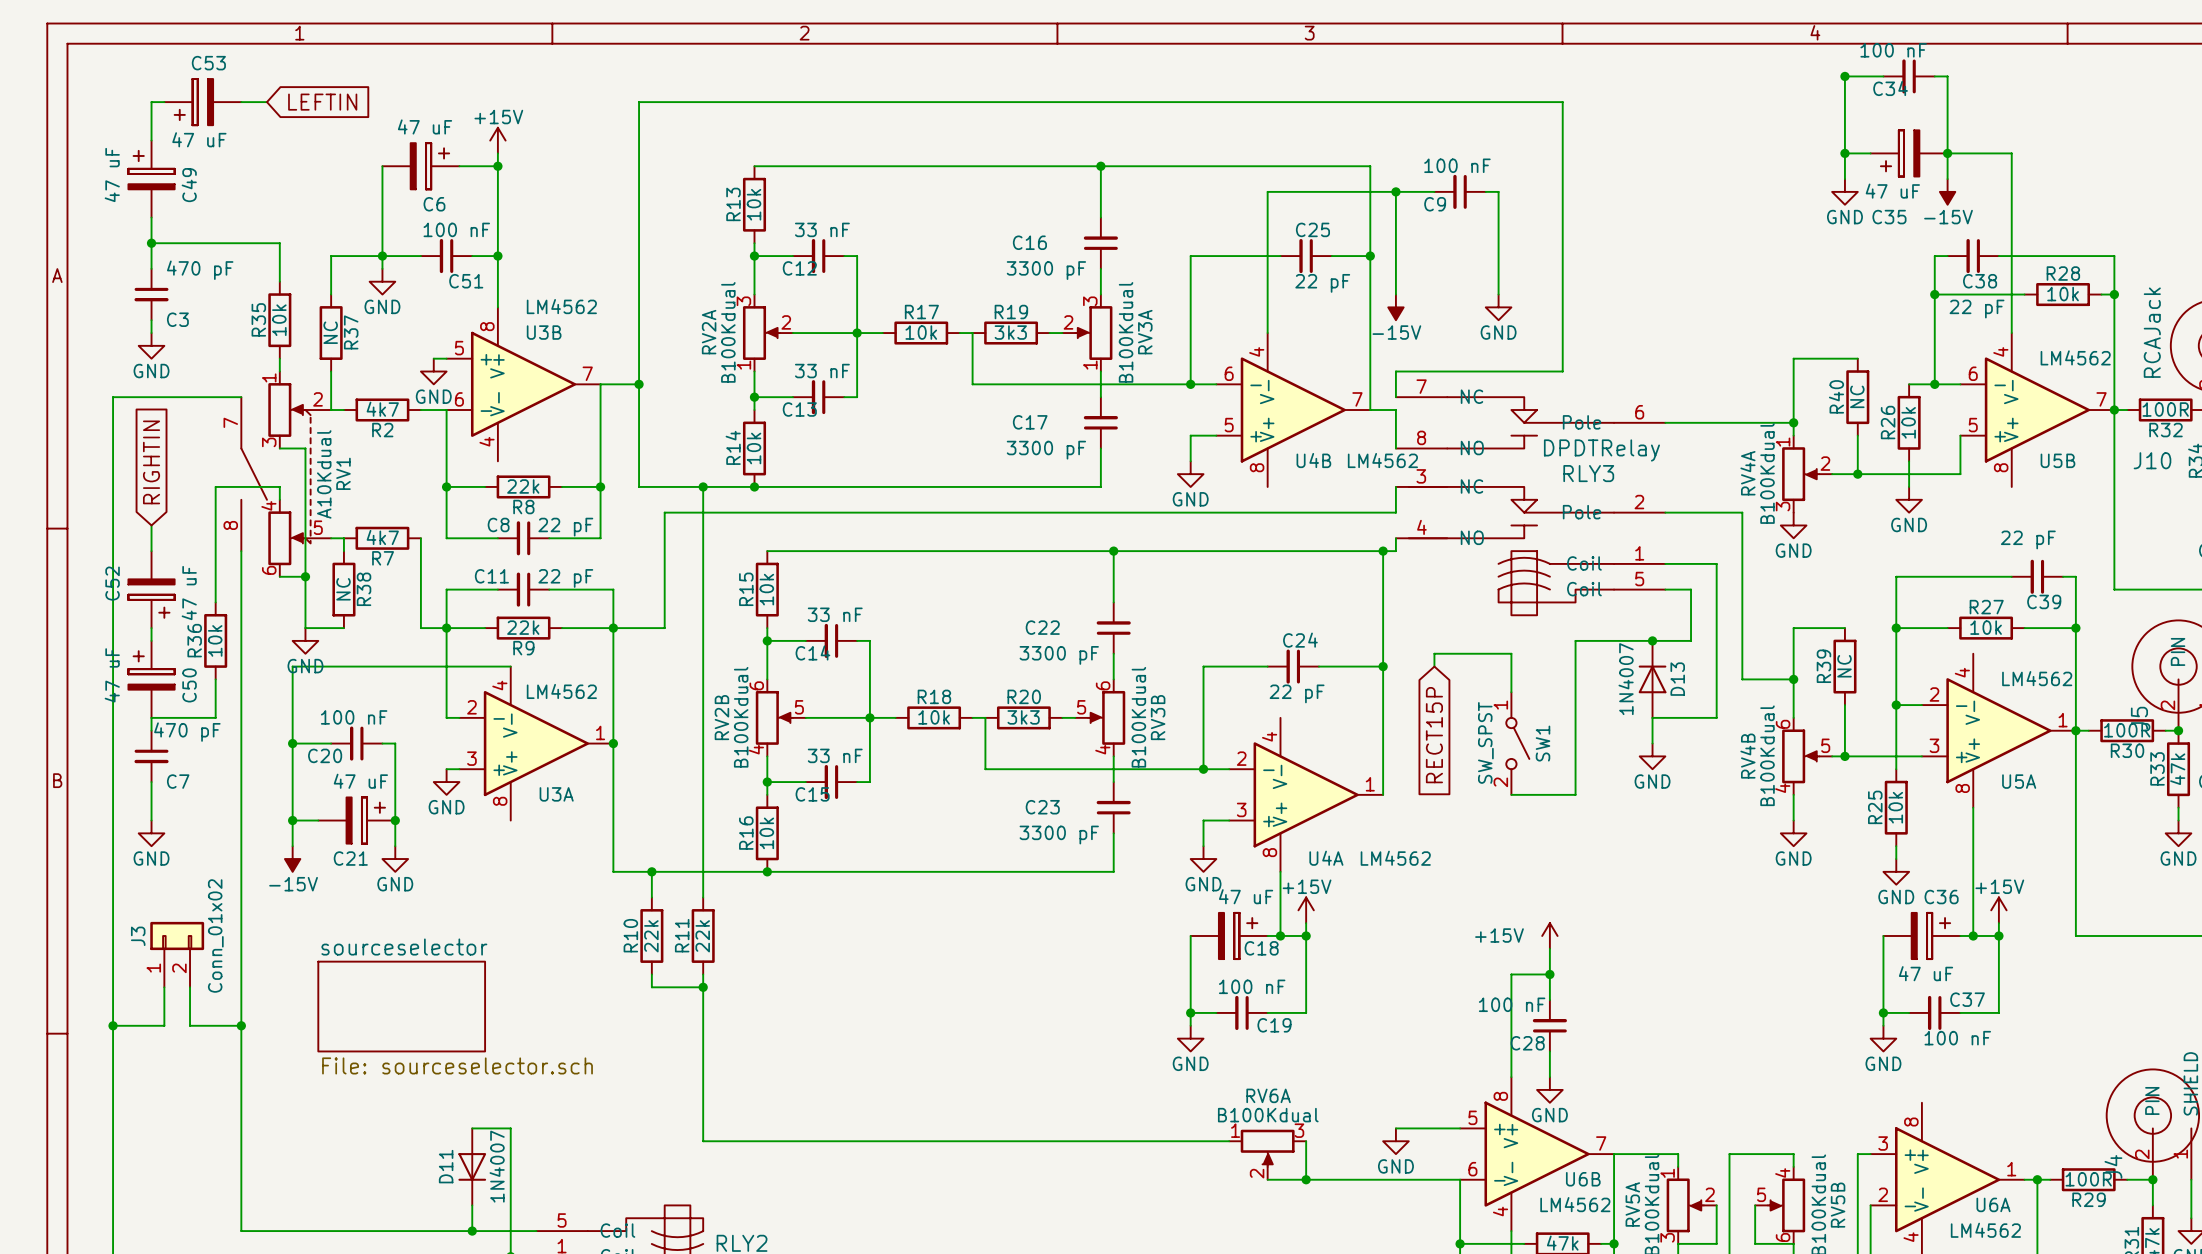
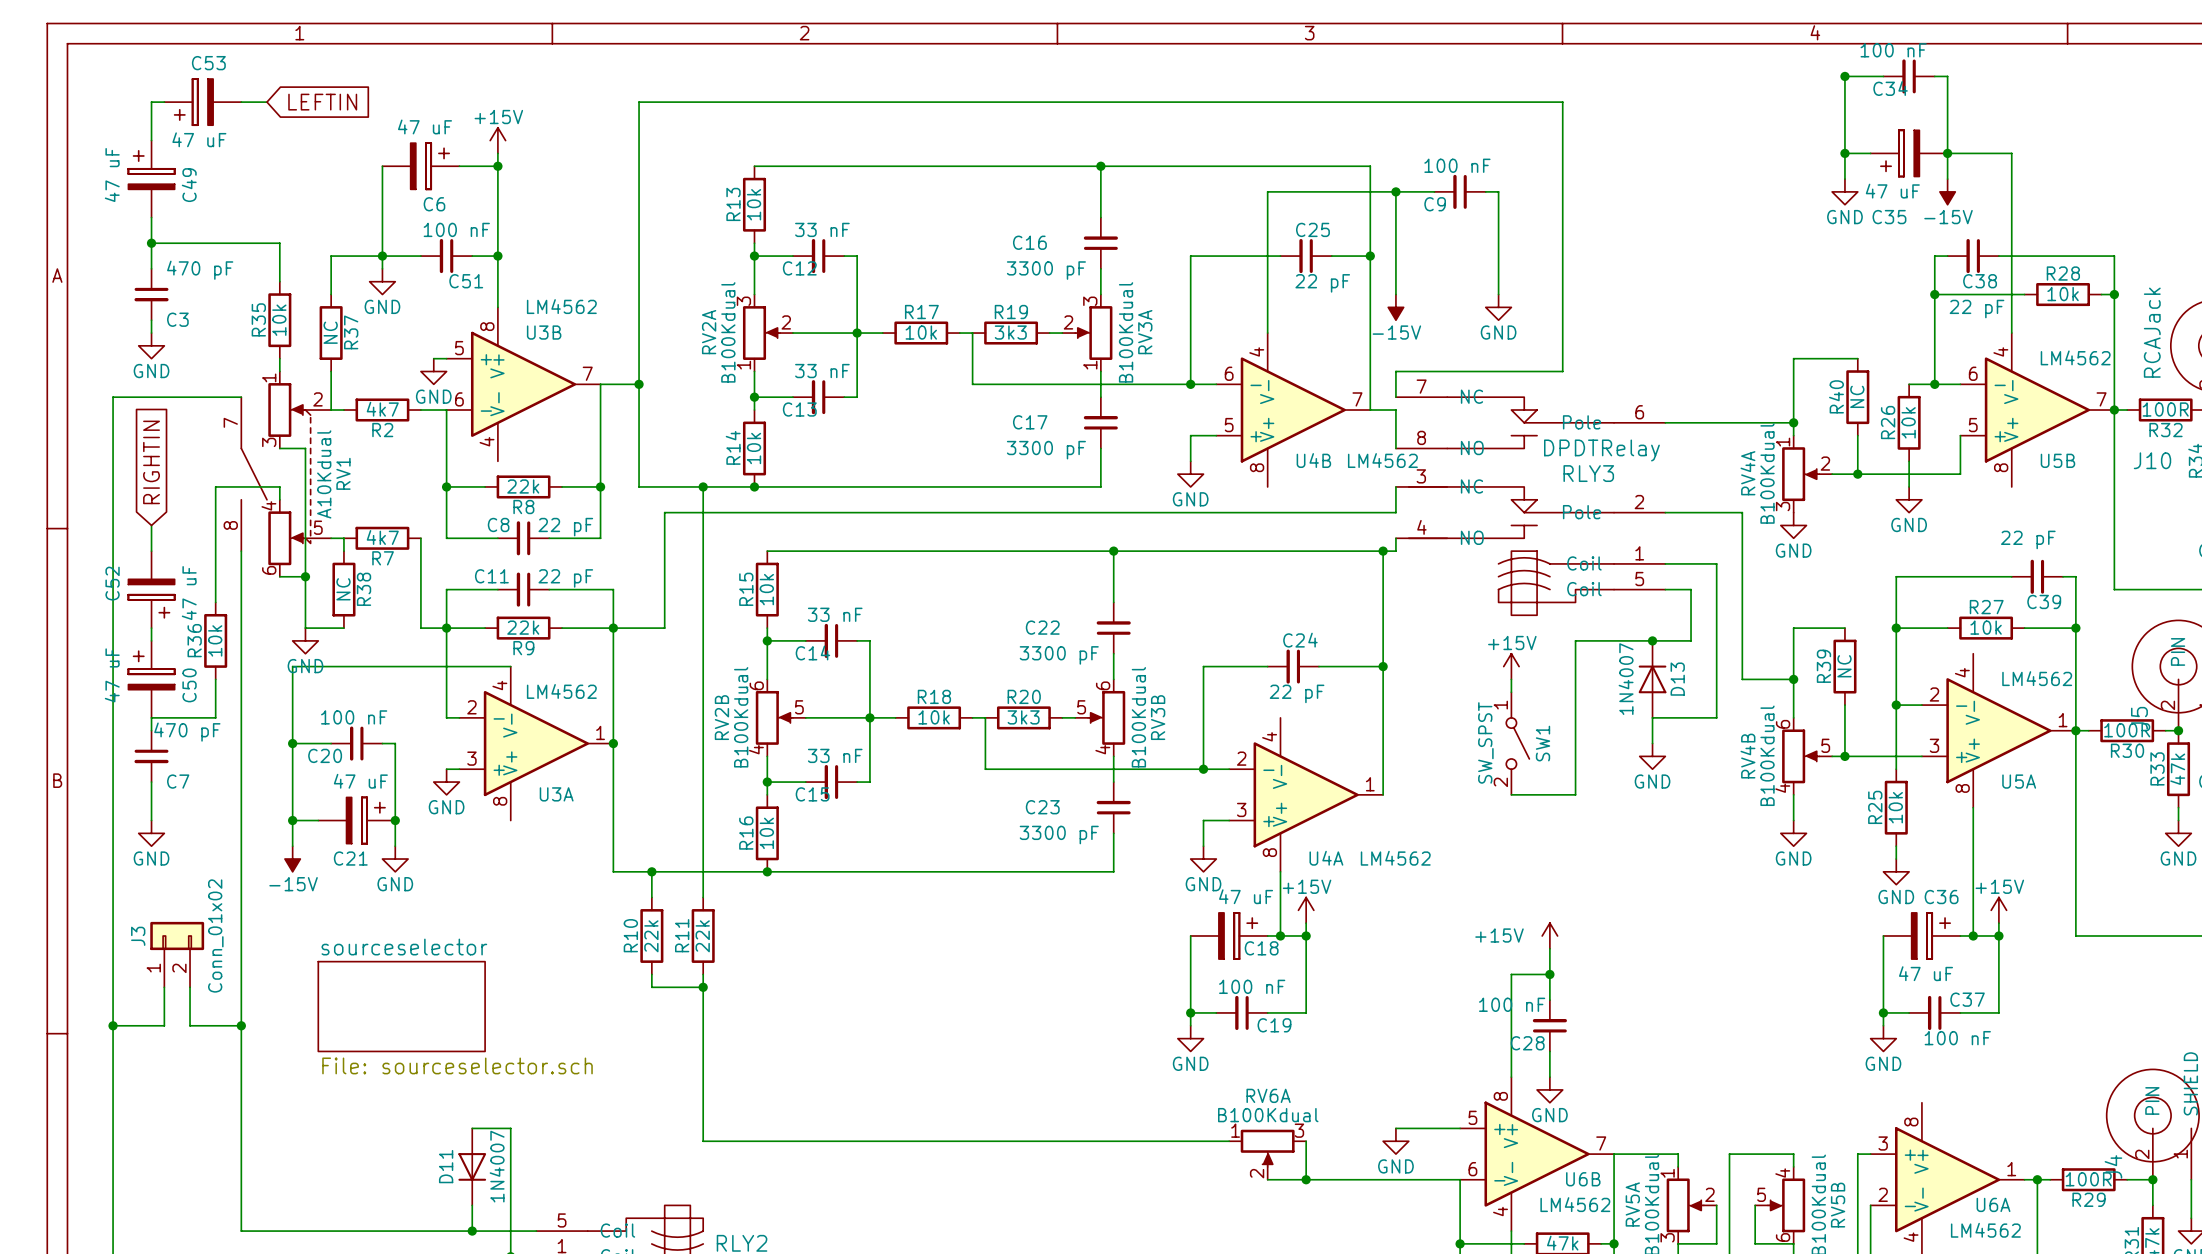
wire: (1434, 666) (1434, 653) (1511, 653) (1511, 679) -> none
power symbol: none -> +15V (1511, 666)
global label: RECT15P (1434, 735) -> none

